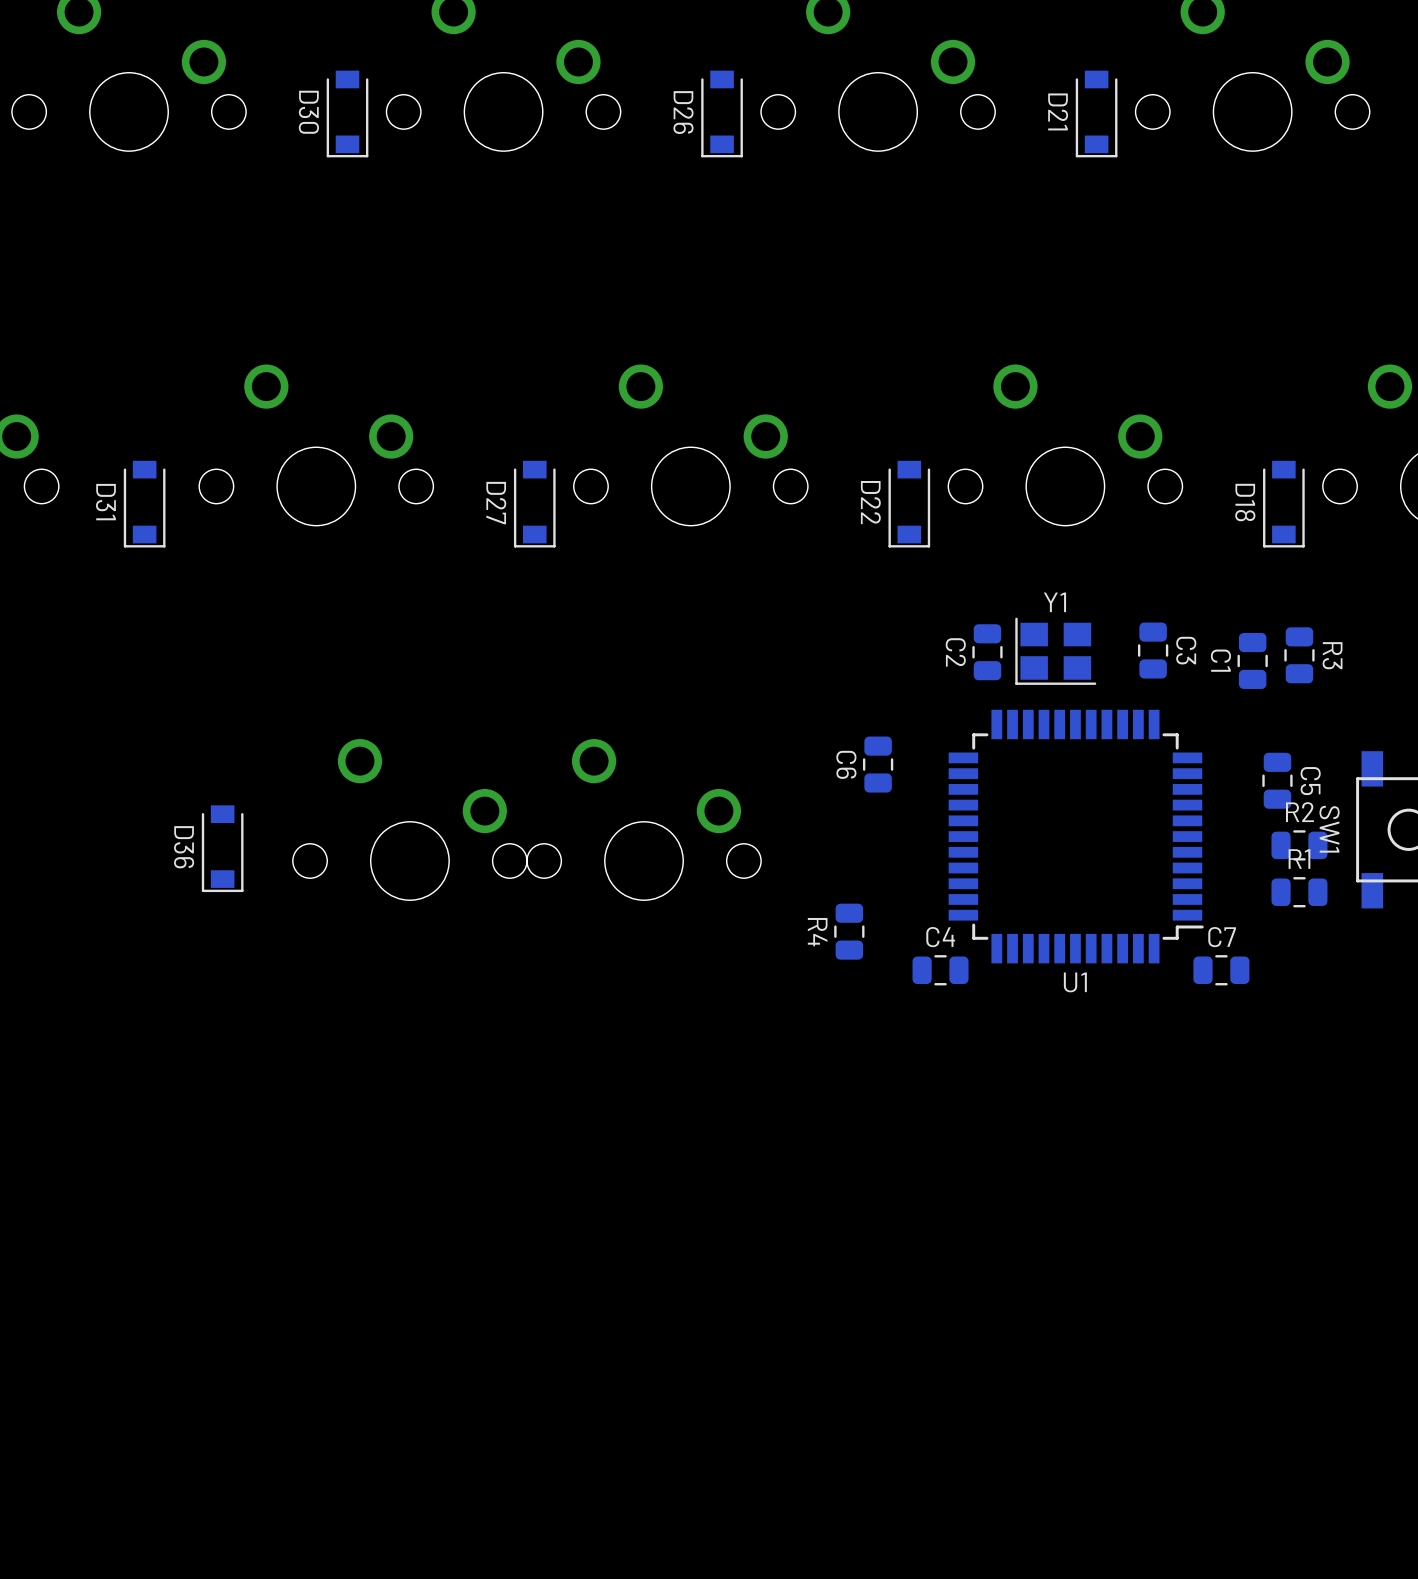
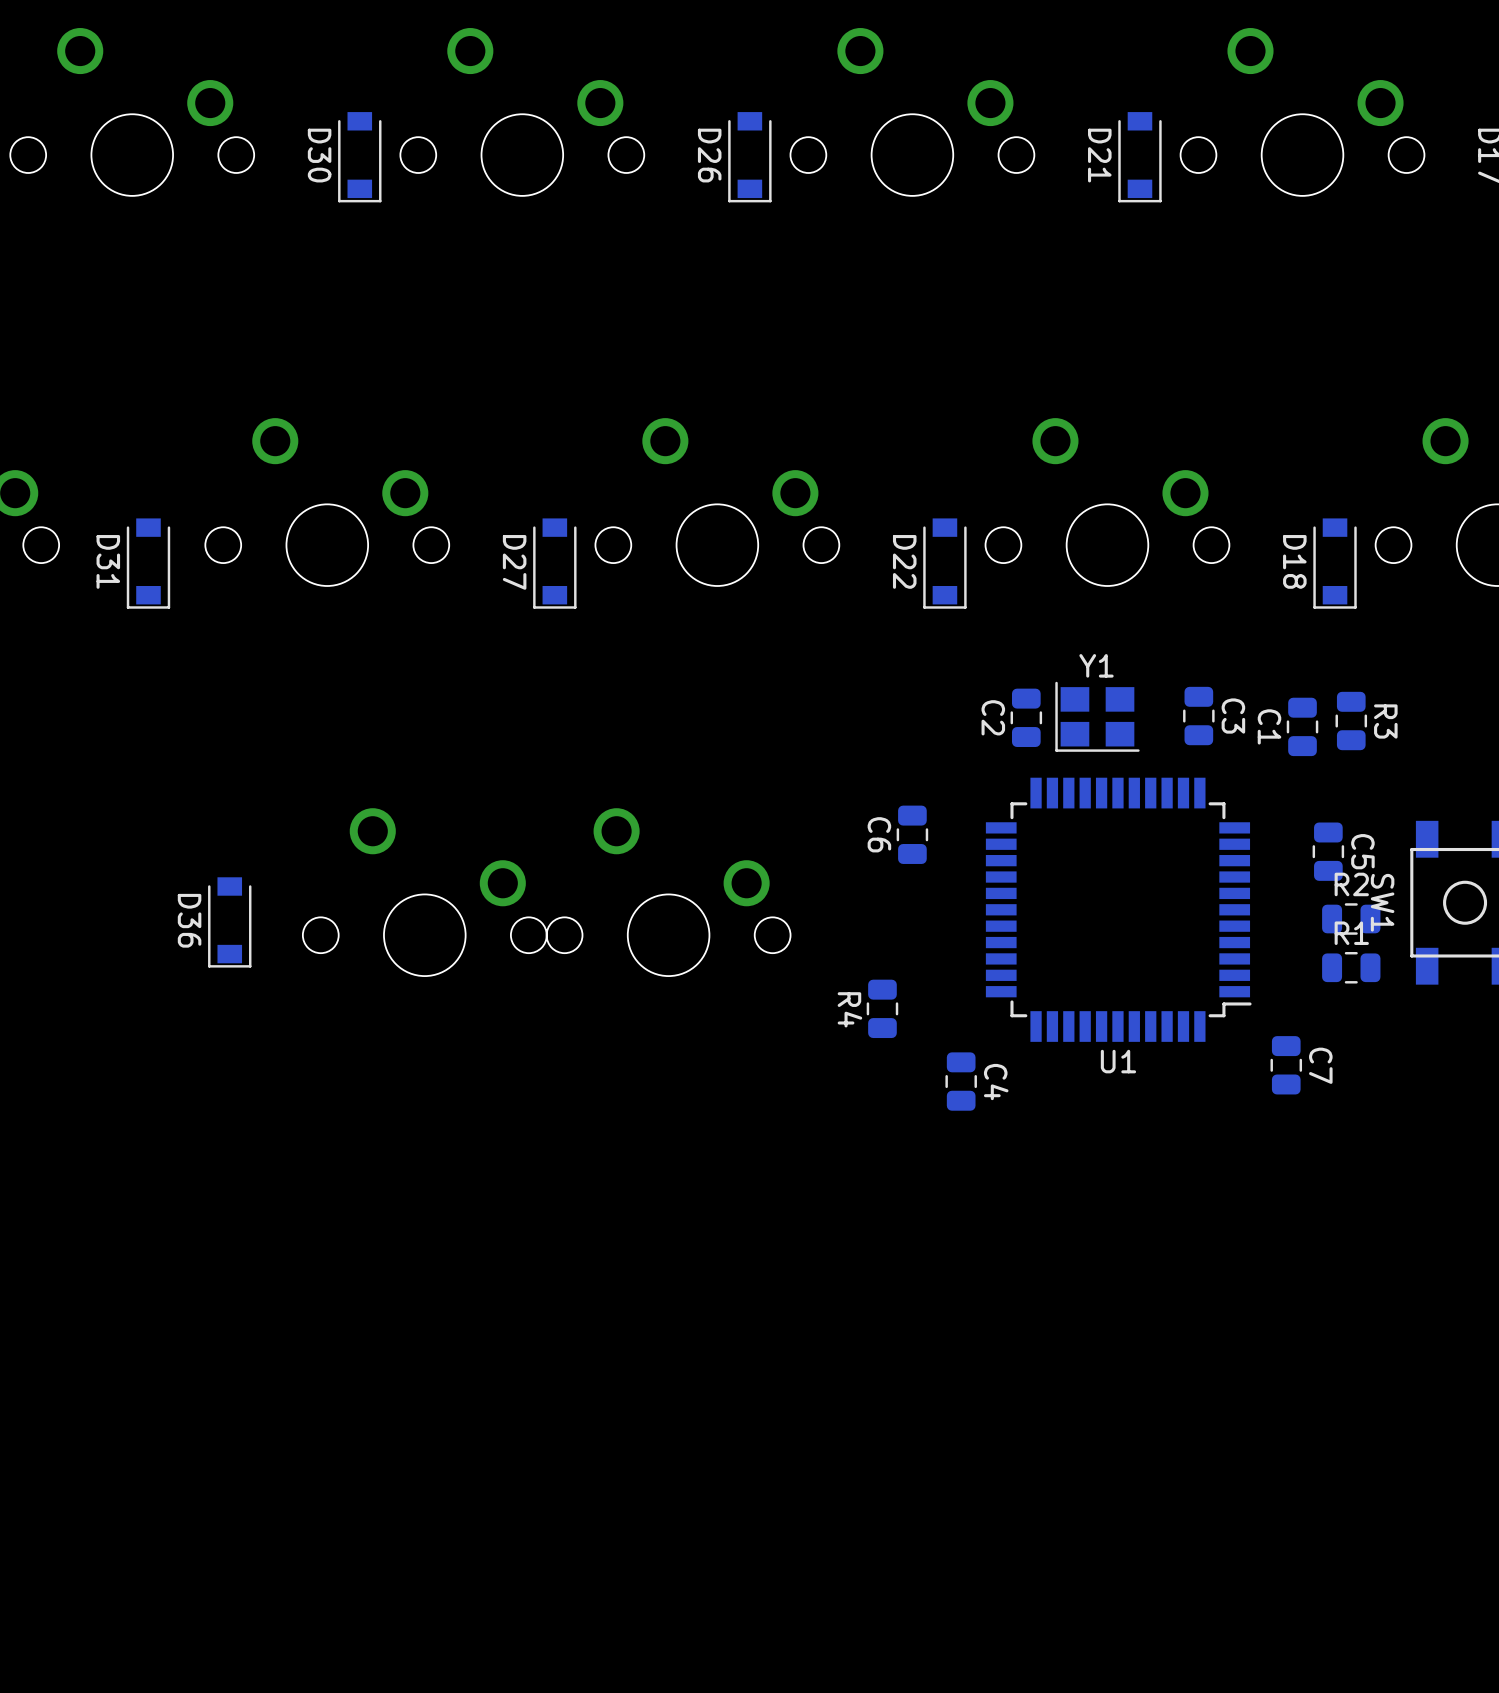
C4 rotation: 0° (940, 970) -> 90° clockwise (961, 1081)
C4 position: (940, 970) -> (961, 1081)
C7 rotation: 0° (1221, 970) -> 90° clockwise (1286, 1065)

